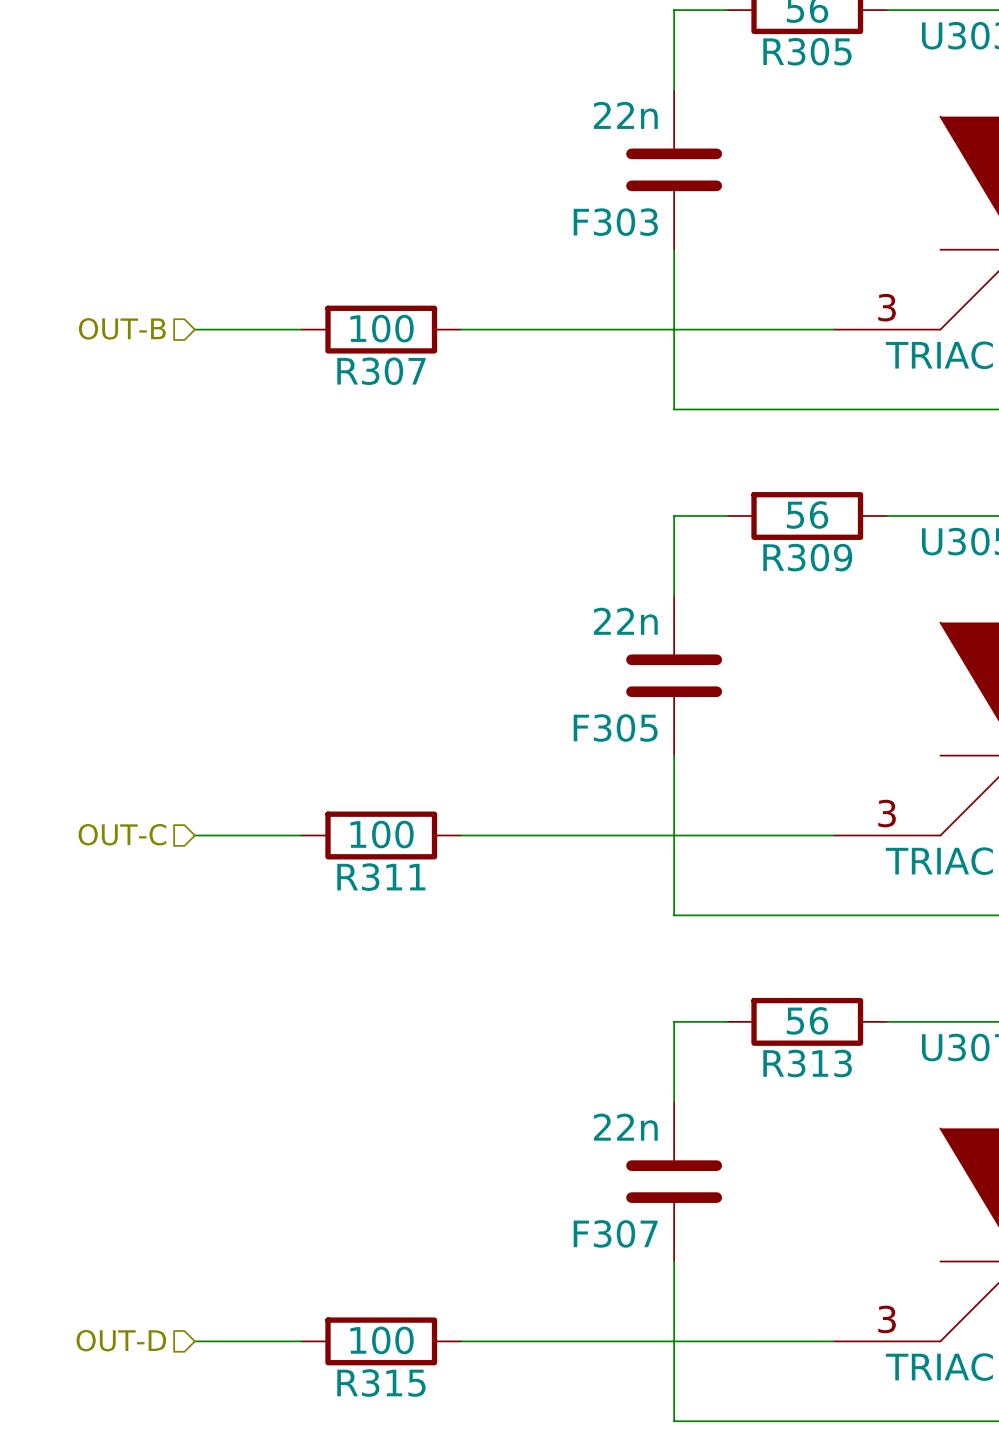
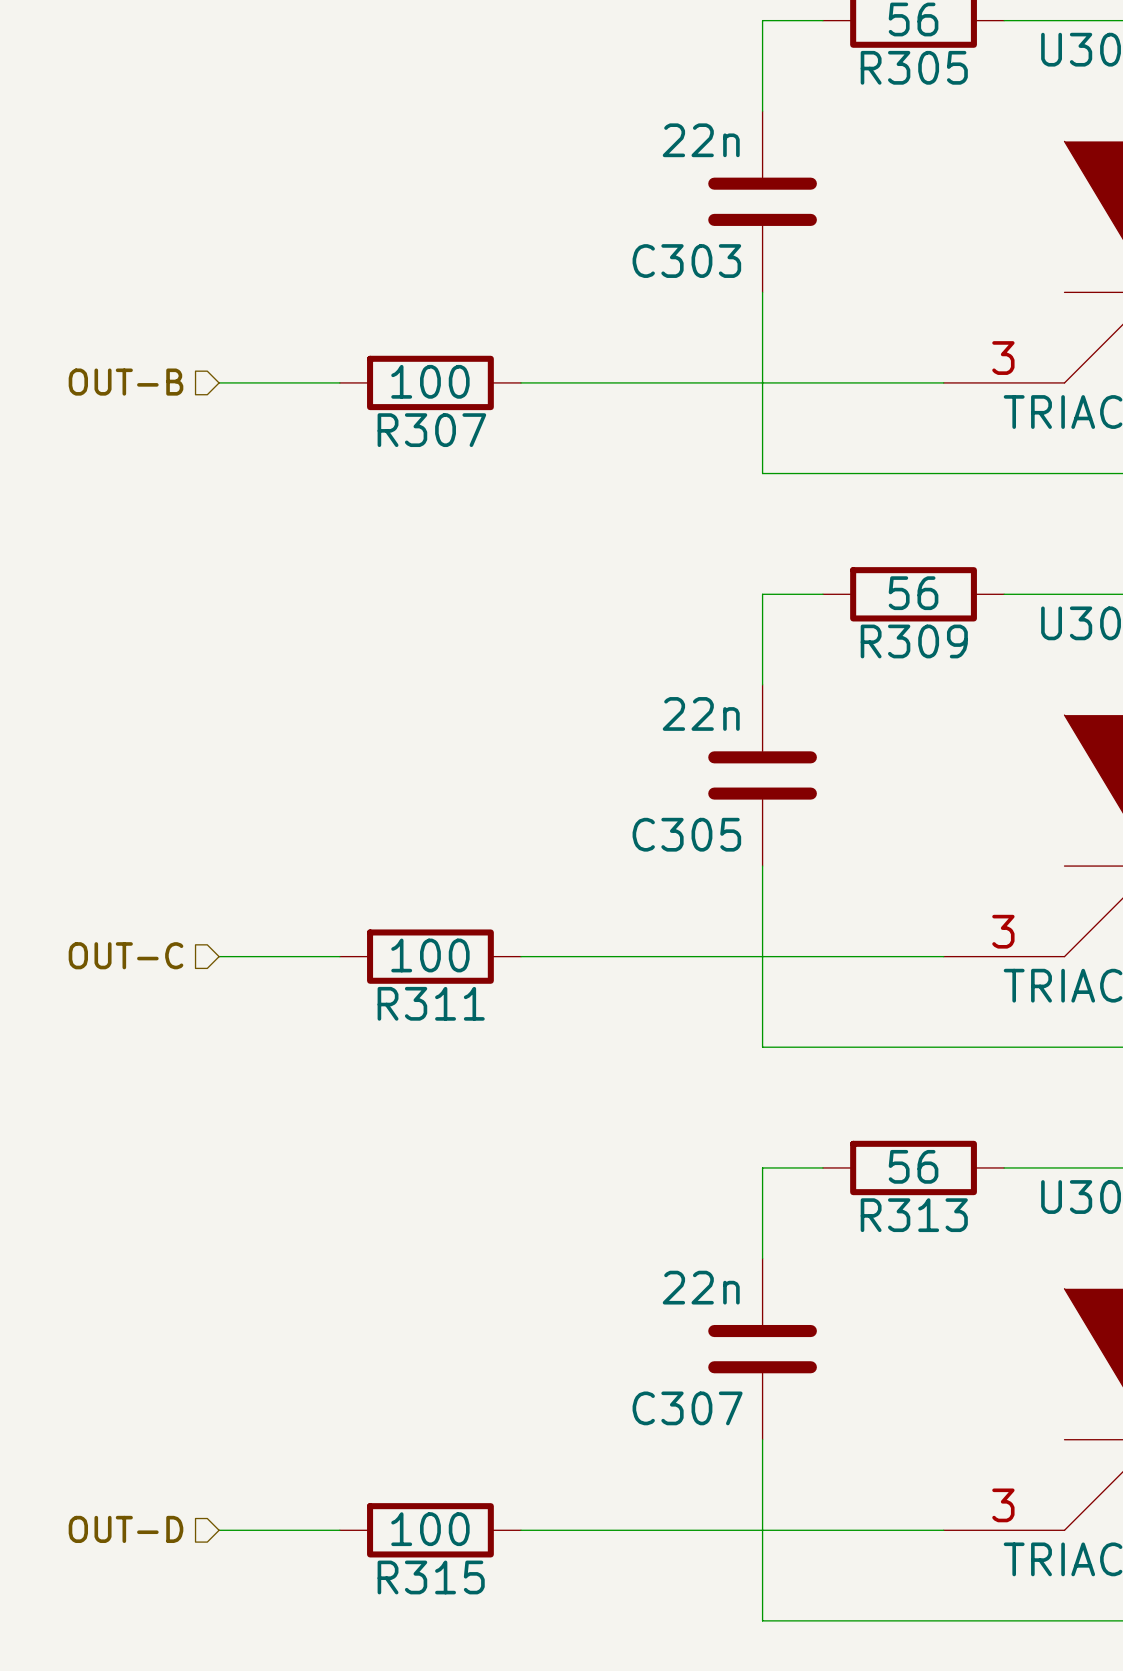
F303 name: F303 (615, 222) -> C303 (686, 261)
F305 name: F305 (615, 728) -> C305 (686, 834)
F307 name: F307 (615, 1233) -> C307 (687, 1408)

